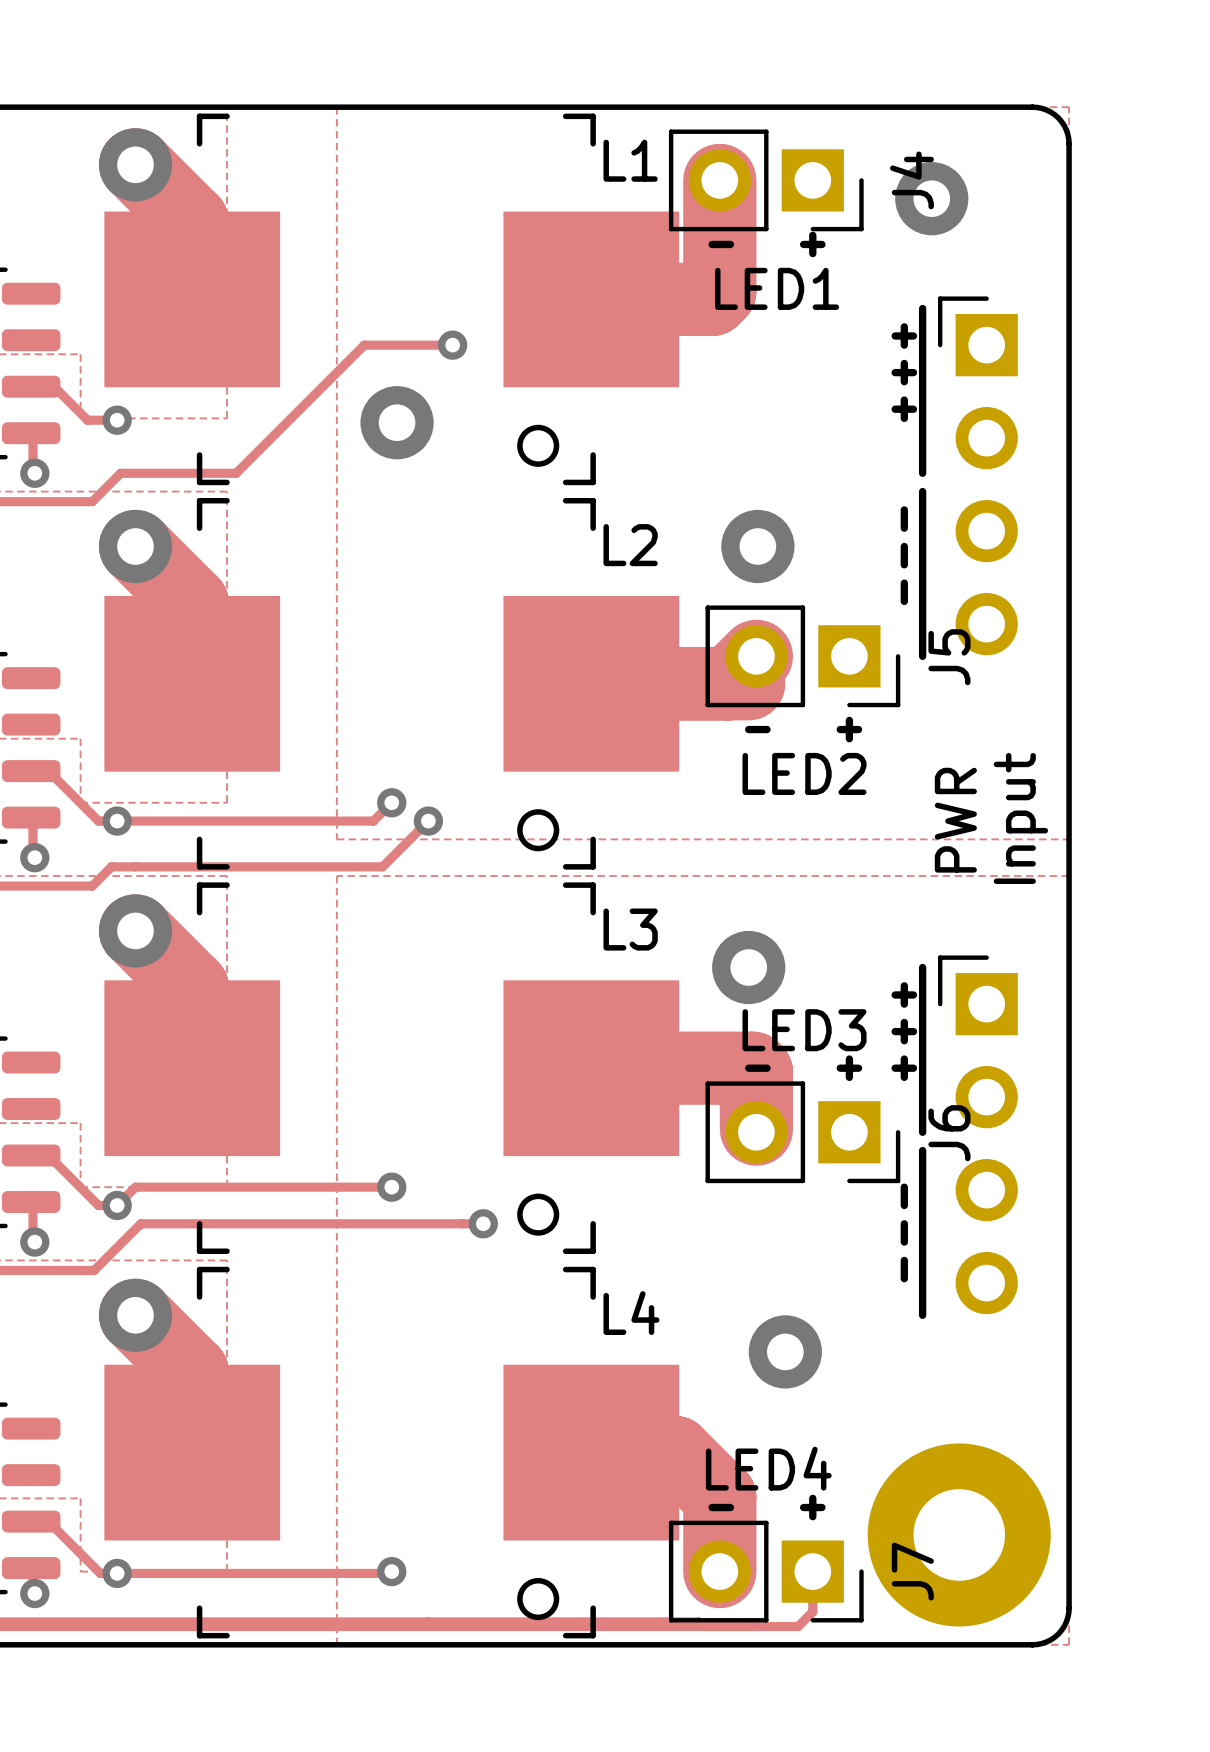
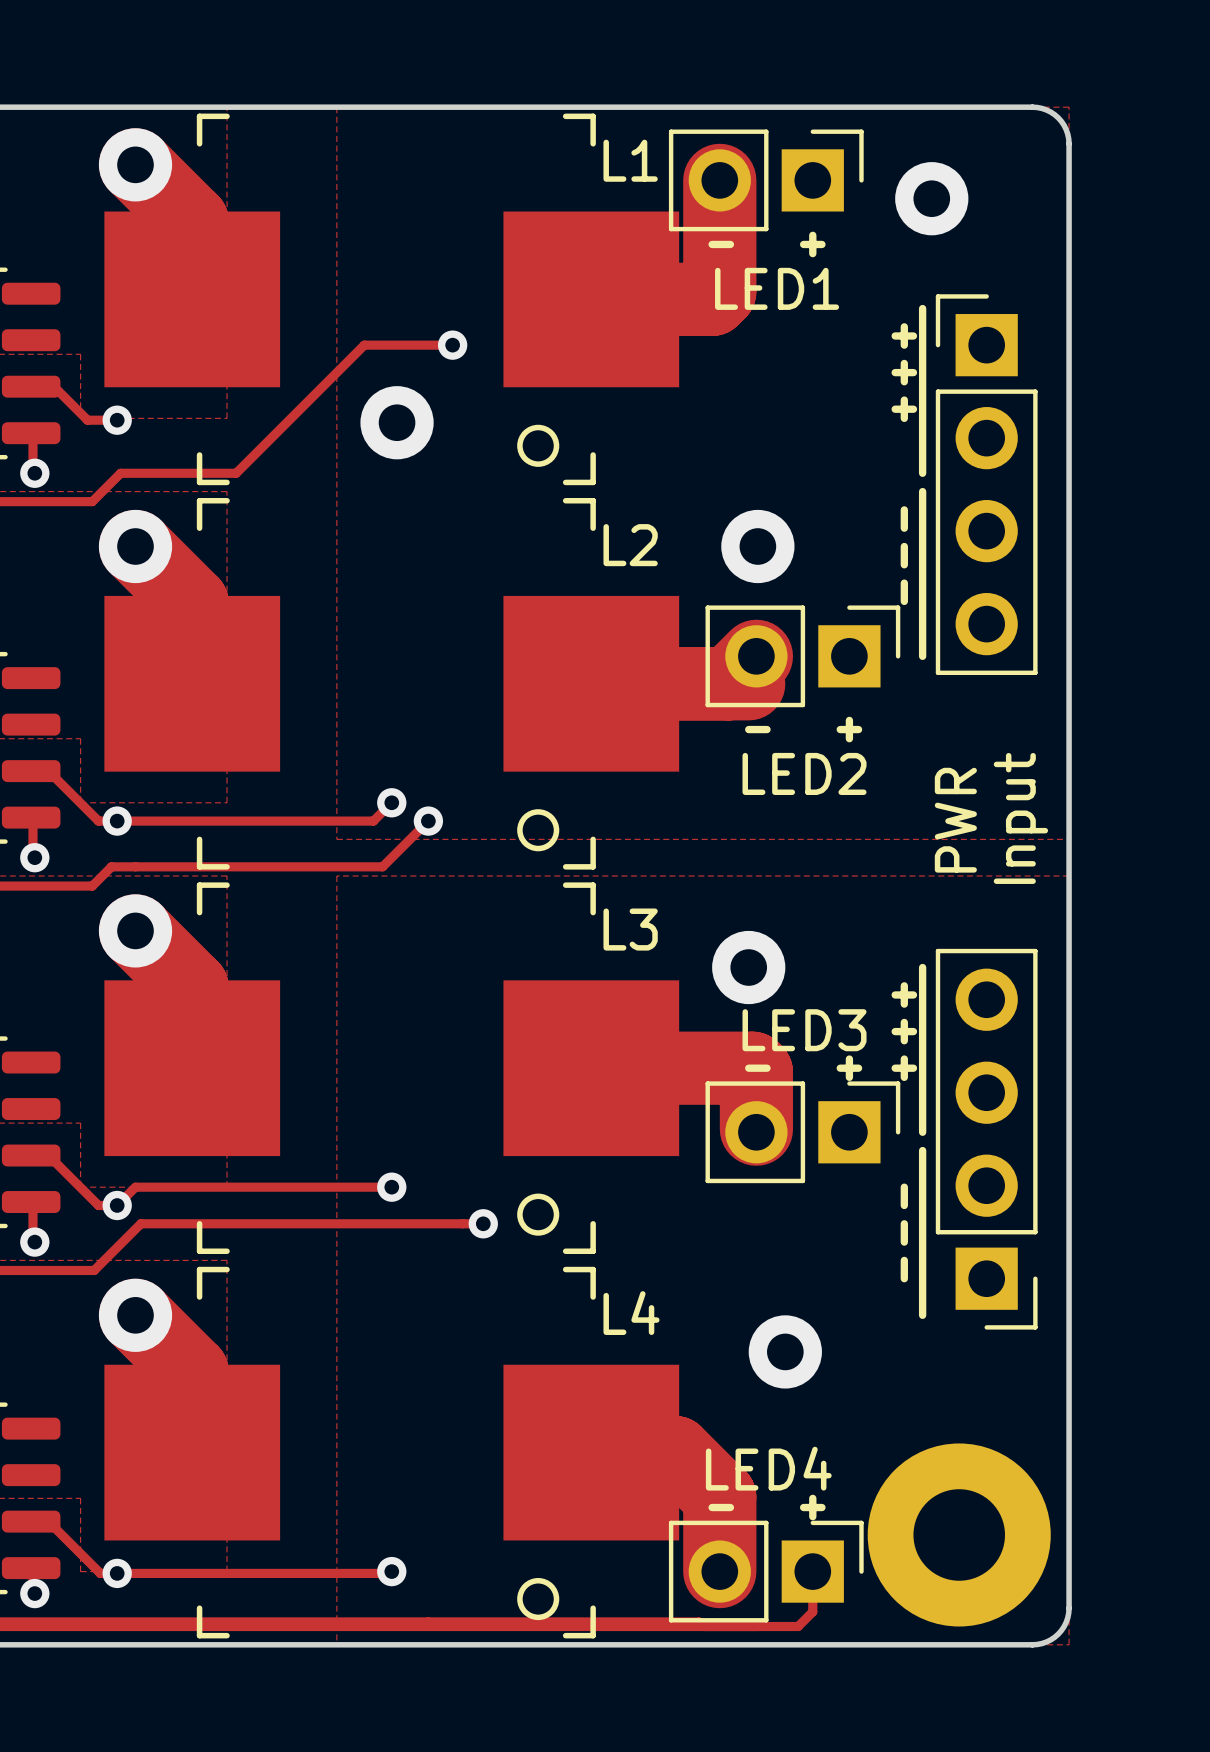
J4: (766, 180) -> none
part: none -> (766, 180)
part footprint: [938, 296, 1018, 656] -> [935, 294, 1038, 676]
J5: (802, 656) -> none
part: none -> (802, 656)
part footprint: [938, 955, 1018, 1315] -> [935, 948, 1038, 1330]
J6: (802, 1132) -> none
part: none -> (802, 1132)
J7: (766, 1571) -> none
part: none -> (766, 1571)

